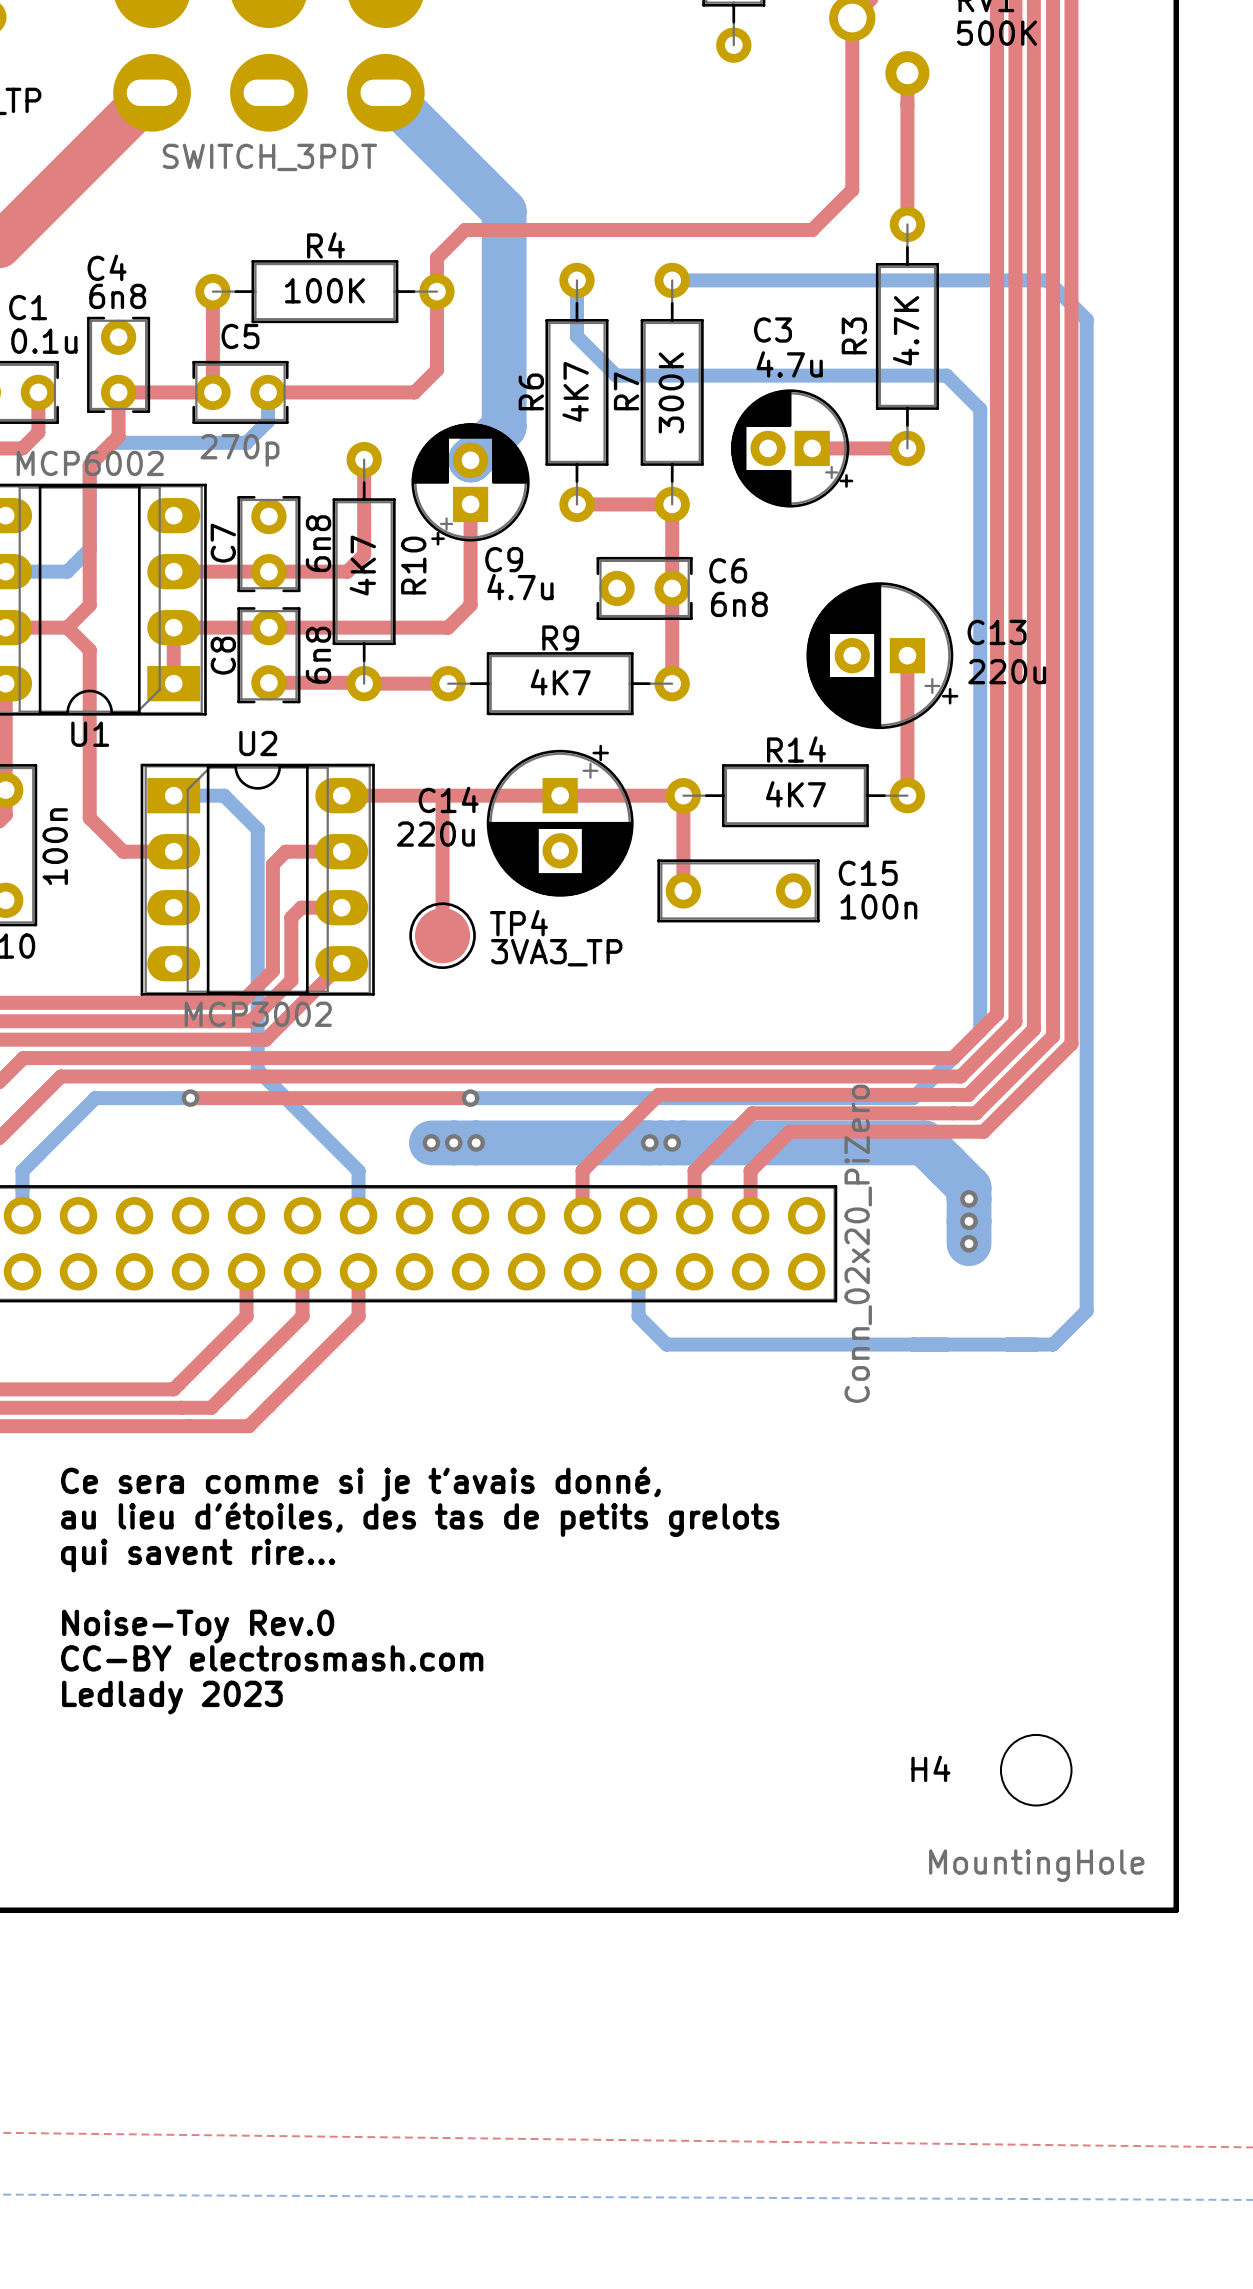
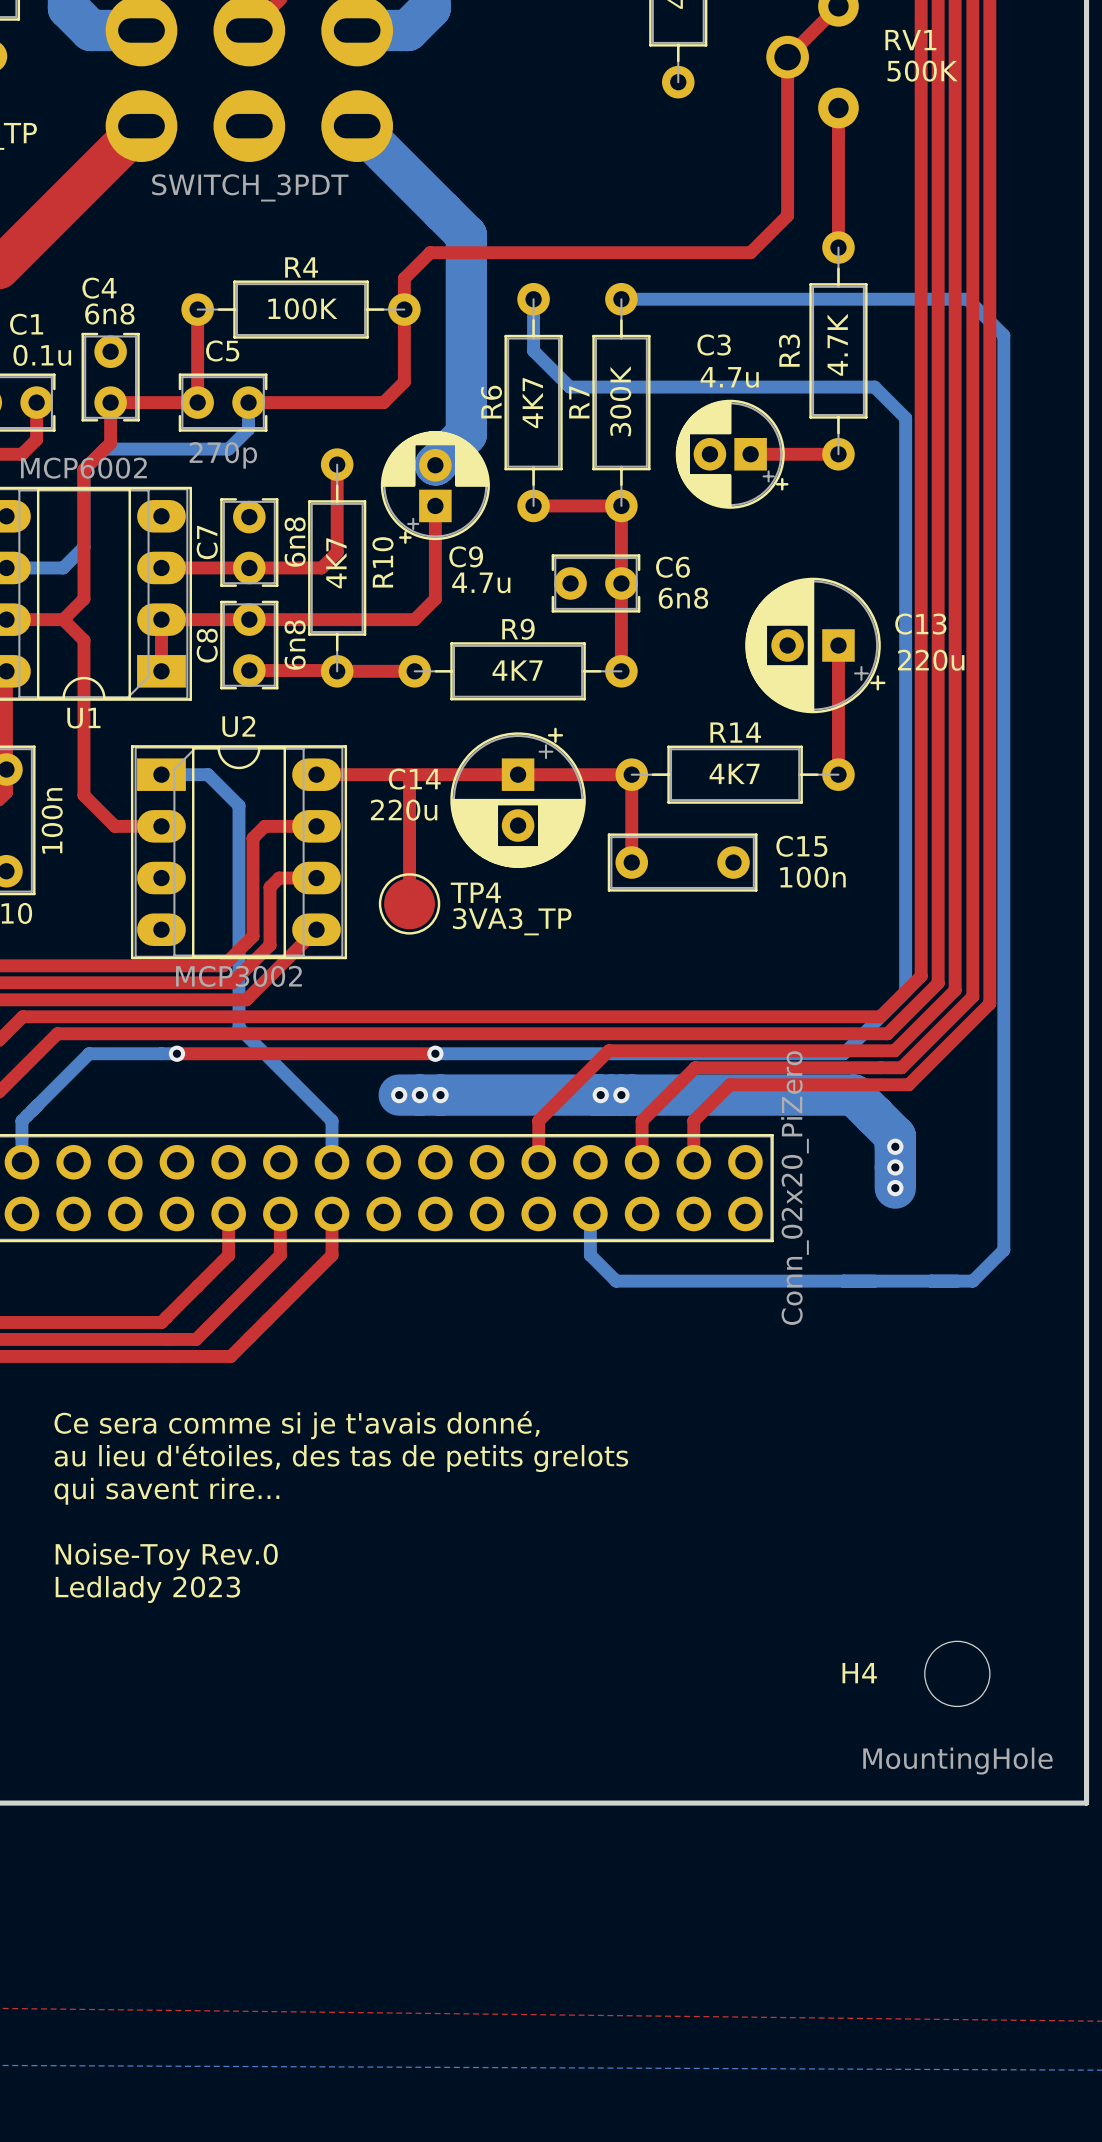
text position: Ce sera comme si je t'avais donné, (360, 1484) -> Ce sera comme si je t'avais donné, (296, 1425)
text position: au lieu d'étoiles, des tas de petits grelots (420, 1519) -> au lieu d'étoiles, des tas de petits grelots (341, 1457)
text position: qui savent rire... (198, 1555) -> qui savent rire... (166, 1491)
text position: Noise-Toy Rev.0 (198, 1626) -> Noise-Toy Rev.0 (166, 1556)
text: CC-BY electrosmash.com (272, 1658) -> none
text position: Ledlady 2023 (172, 1697) -> Ledlady 2023 (147, 1589)

